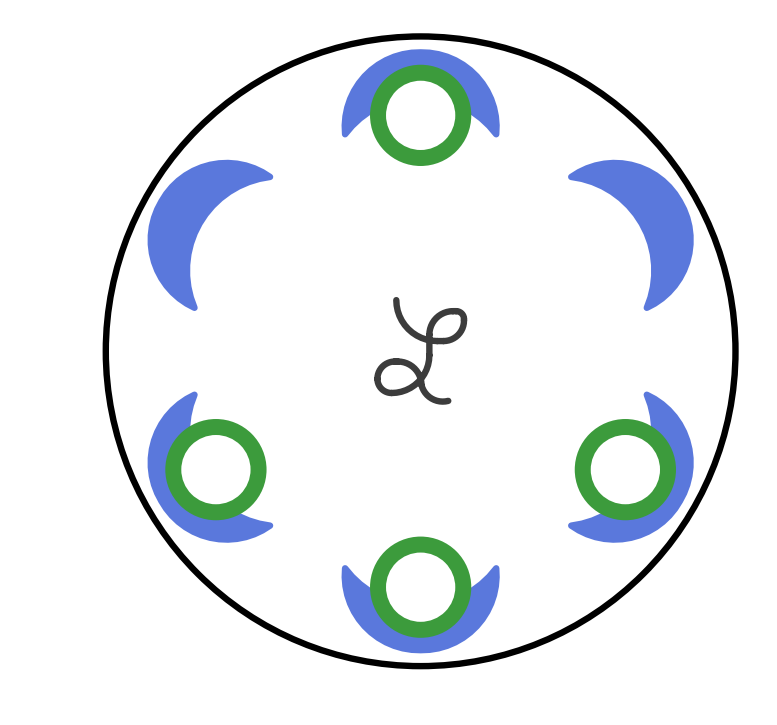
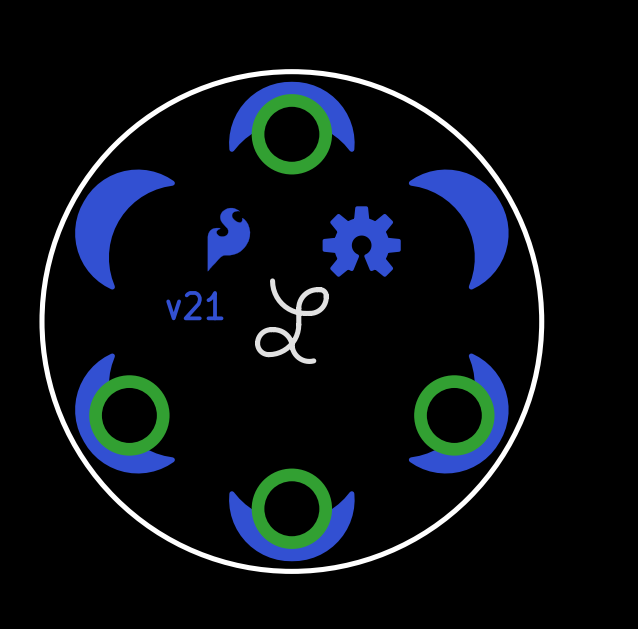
drawing: none -> [322, 206, 401, 277]
drawing: none -> [207, 207, 251, 272]
text: none -> v21 (194, 305)

